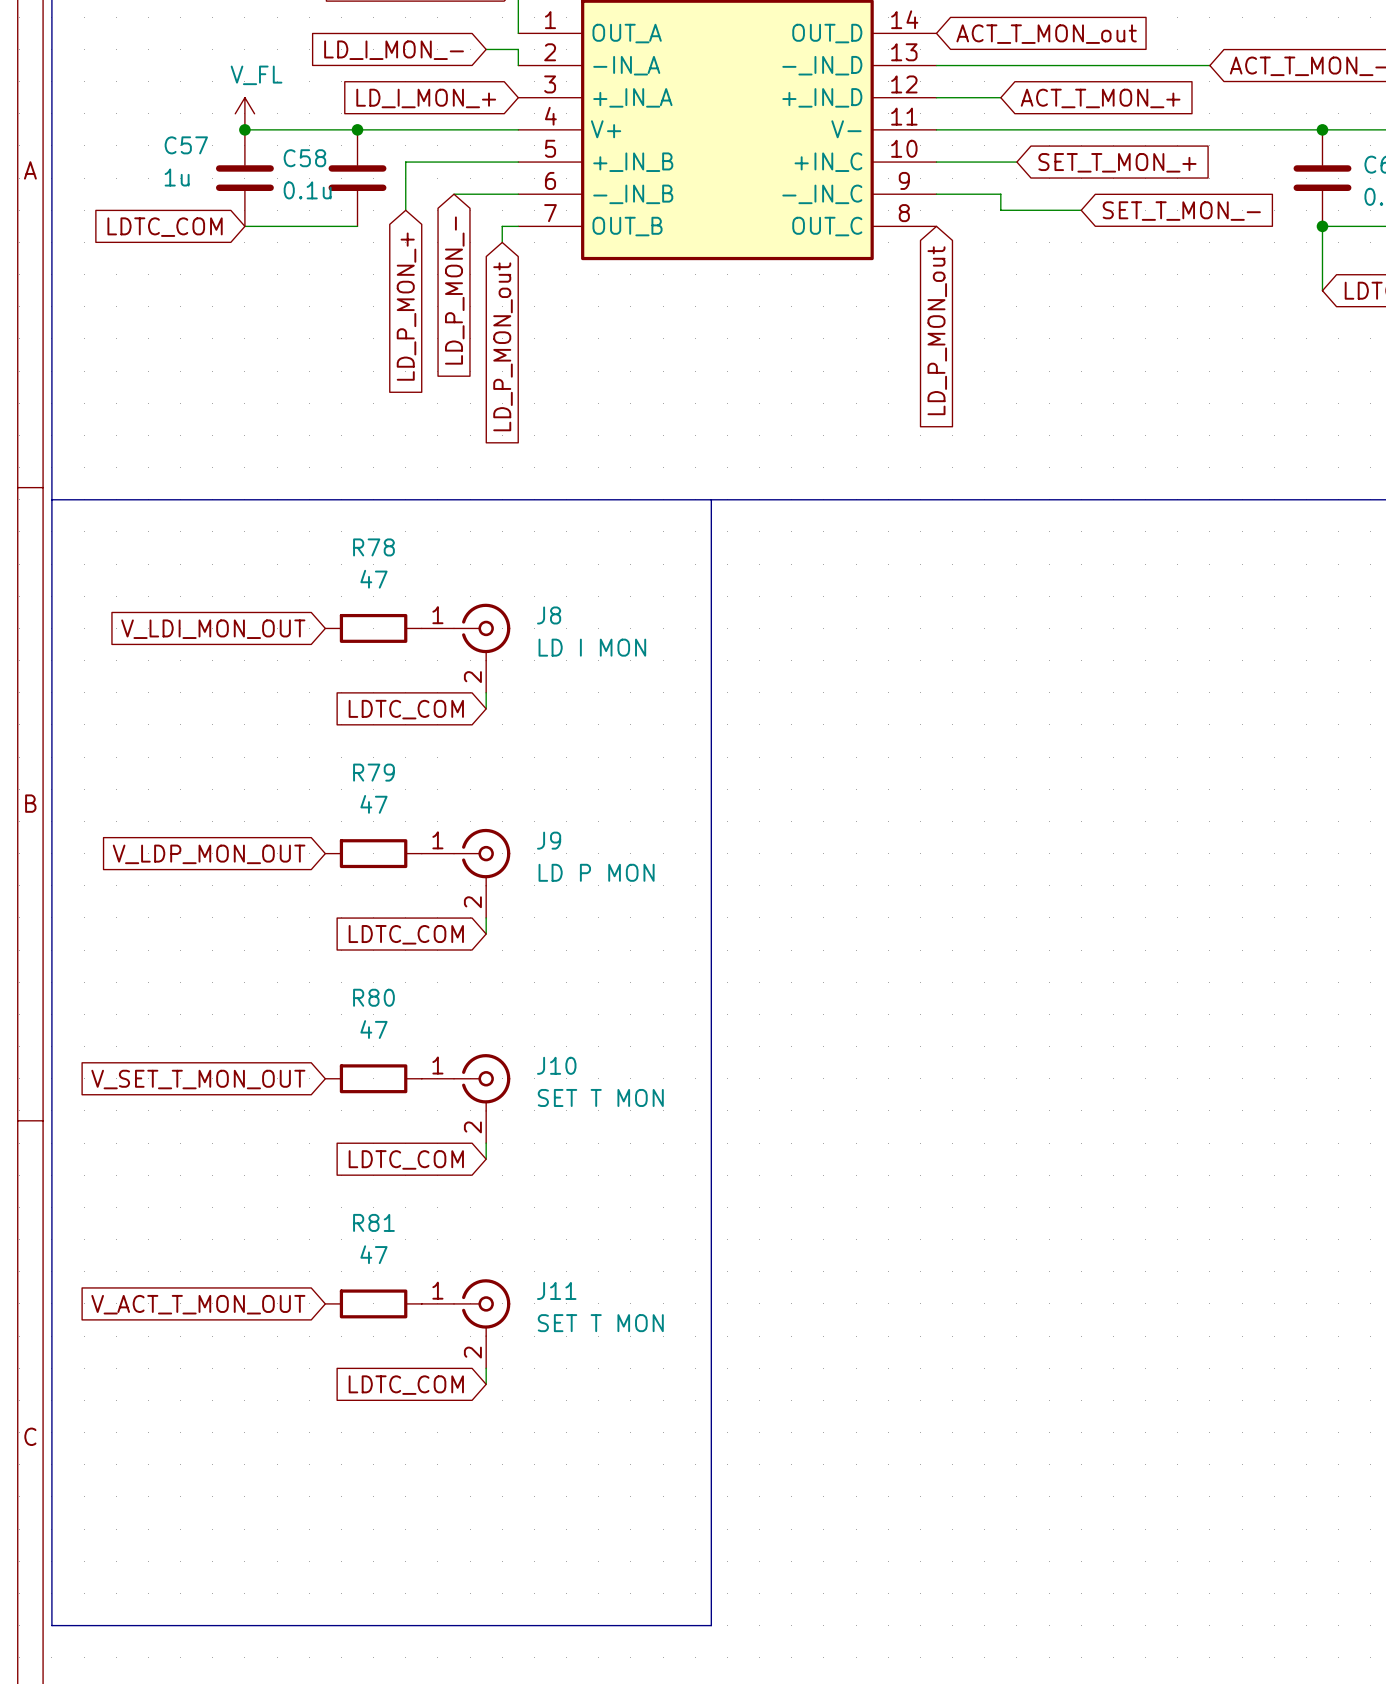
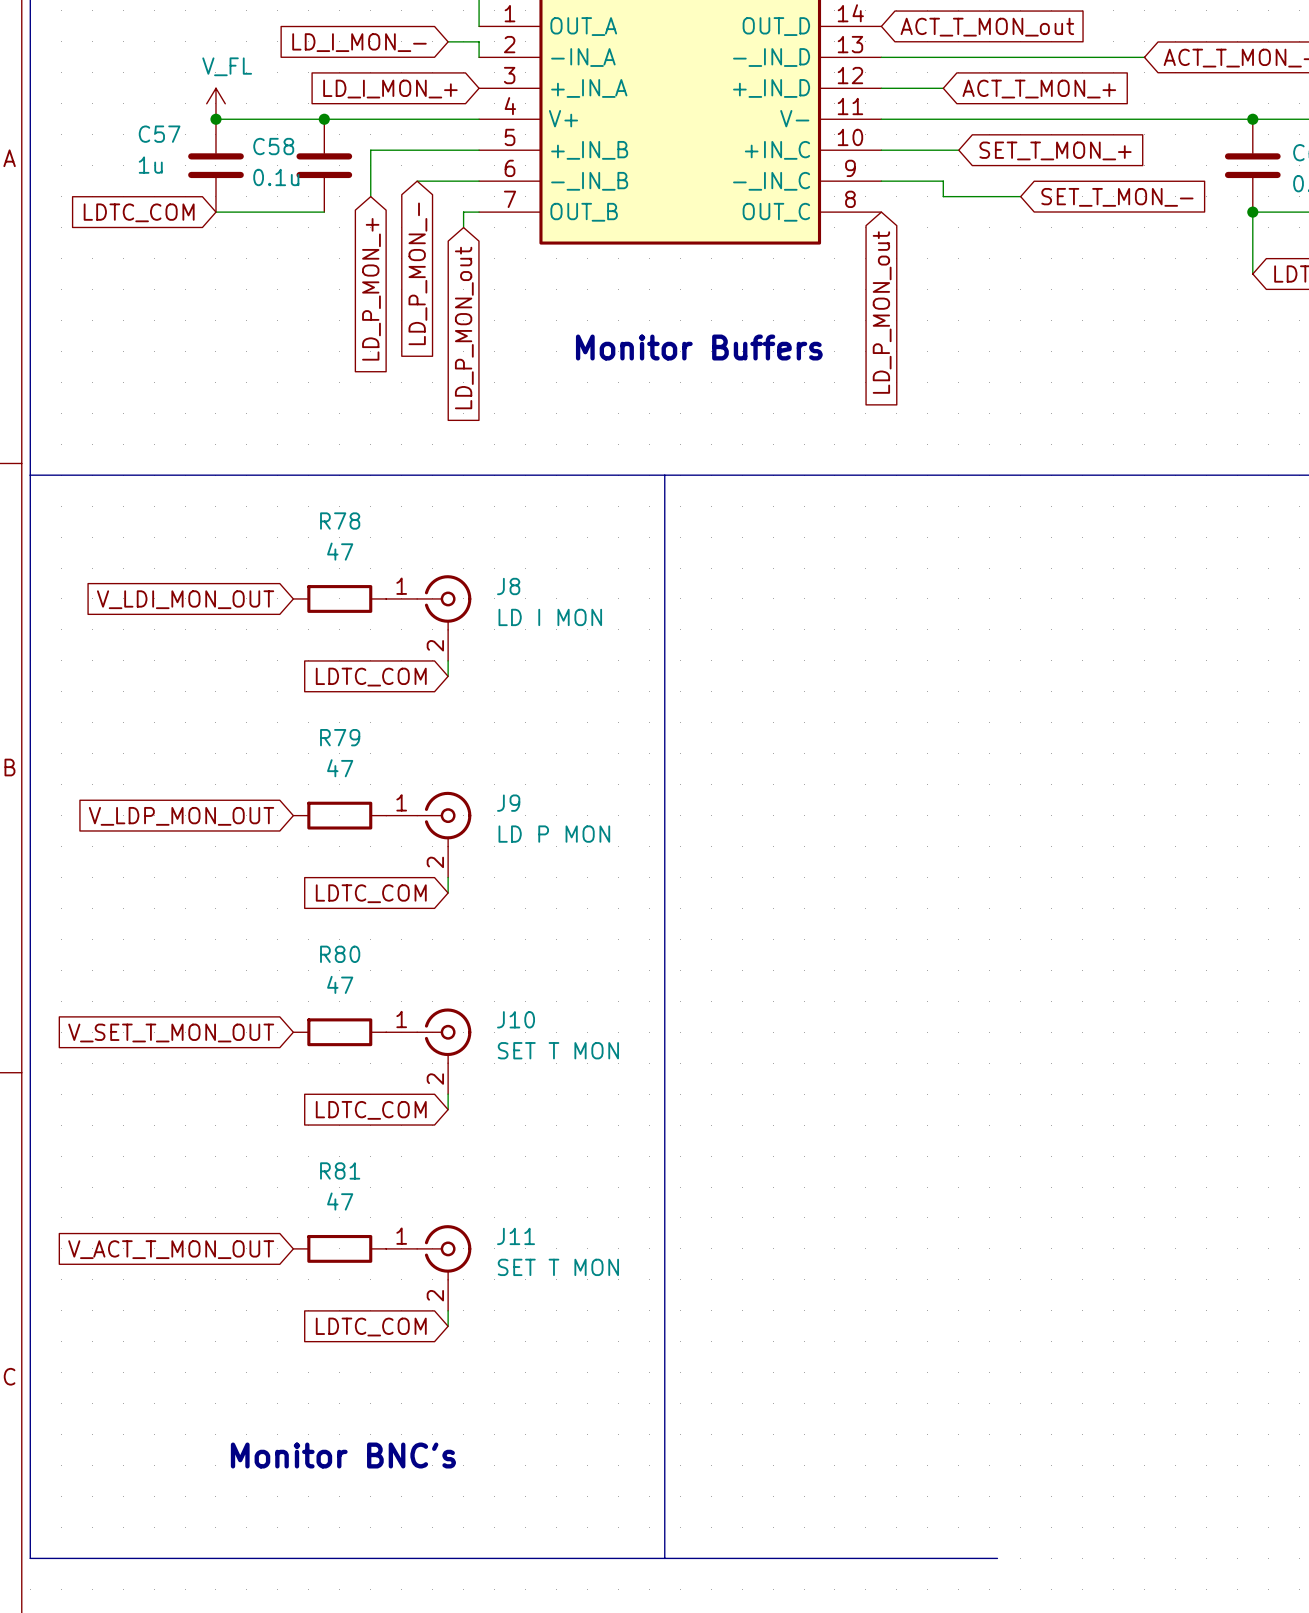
text: none -> Monitor Buffers (699, 347)
text: none -> Monitor BNC's (343, 1455)
line: none -> (664, 1558) (997, 1558)

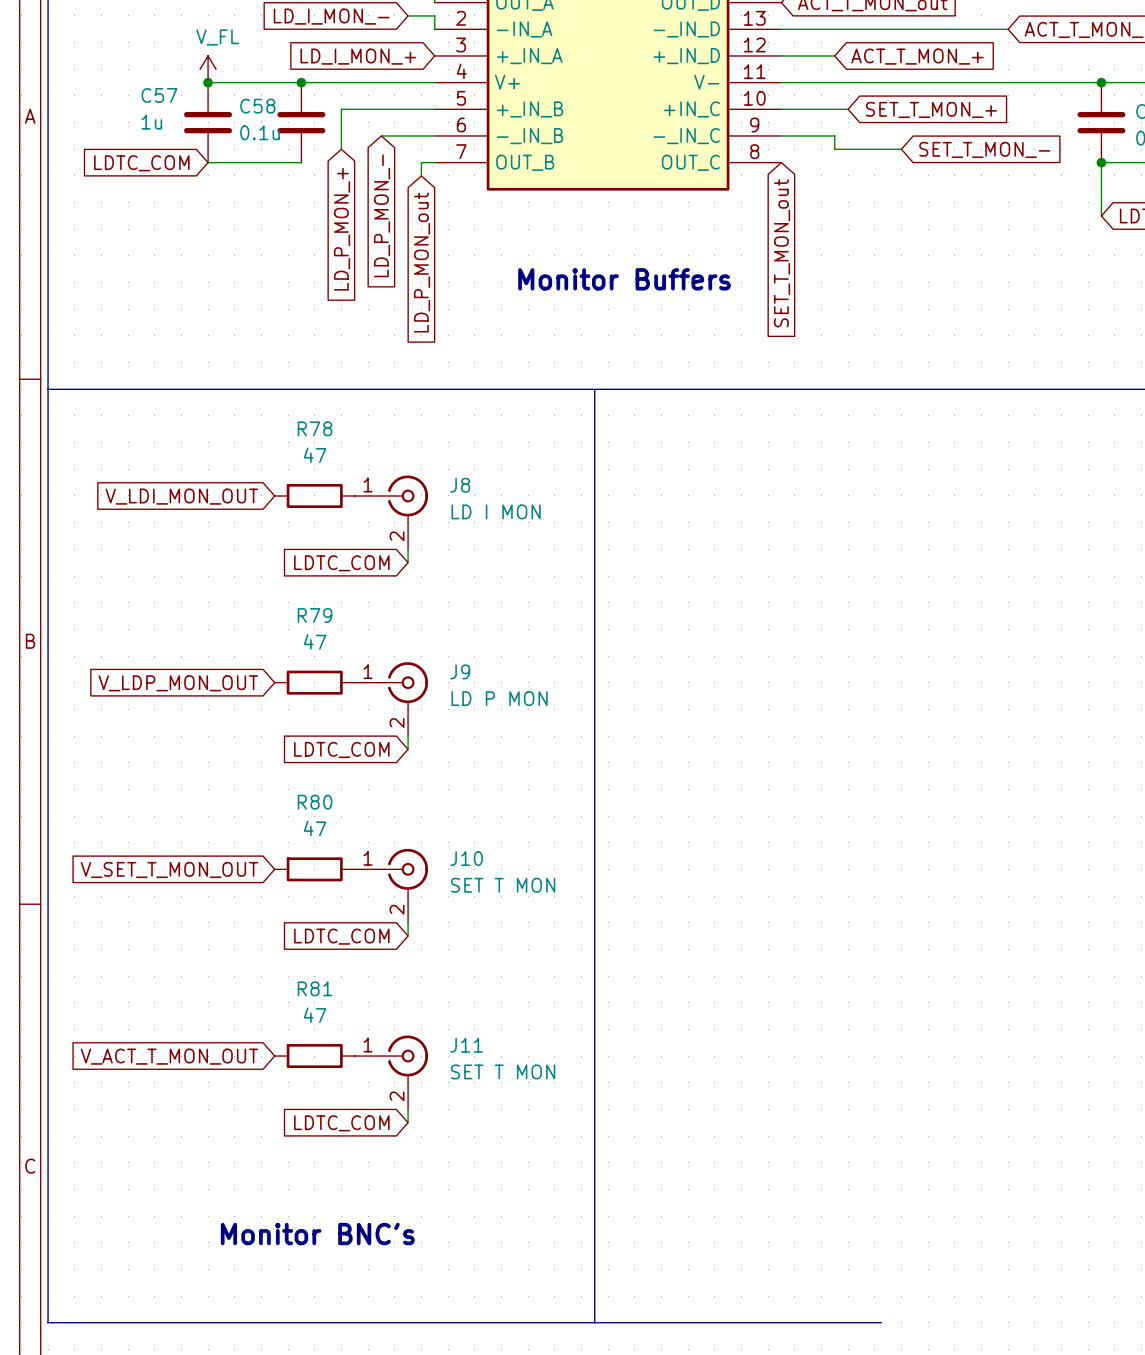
global label: LD_P_MON_out (882, 312) -> SET_T_MON_out (782, 253)

